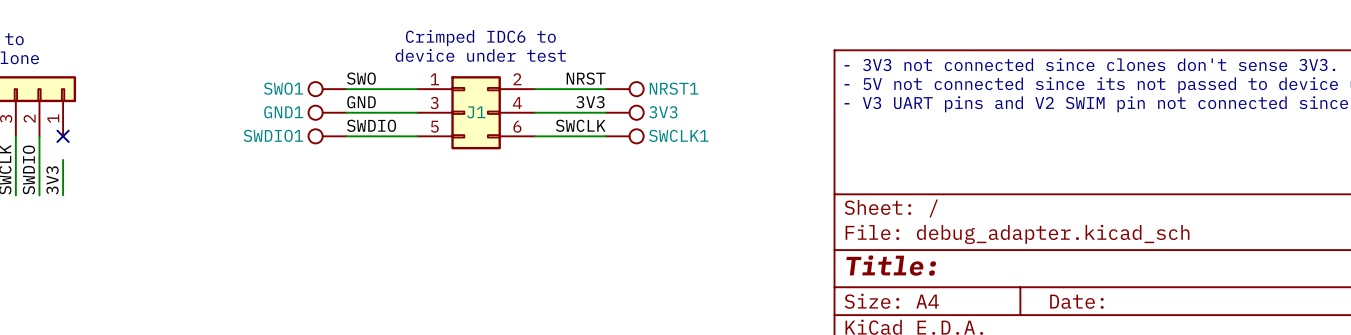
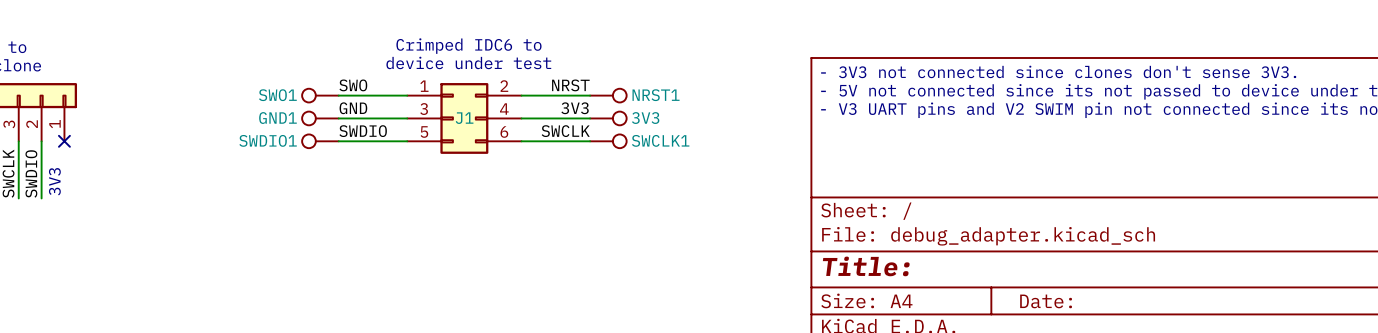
wire: (63, 159) (63, 195) -> none
text: none -> 3V3 (54, 181)
label: 3V3 (52, 180) -> none

